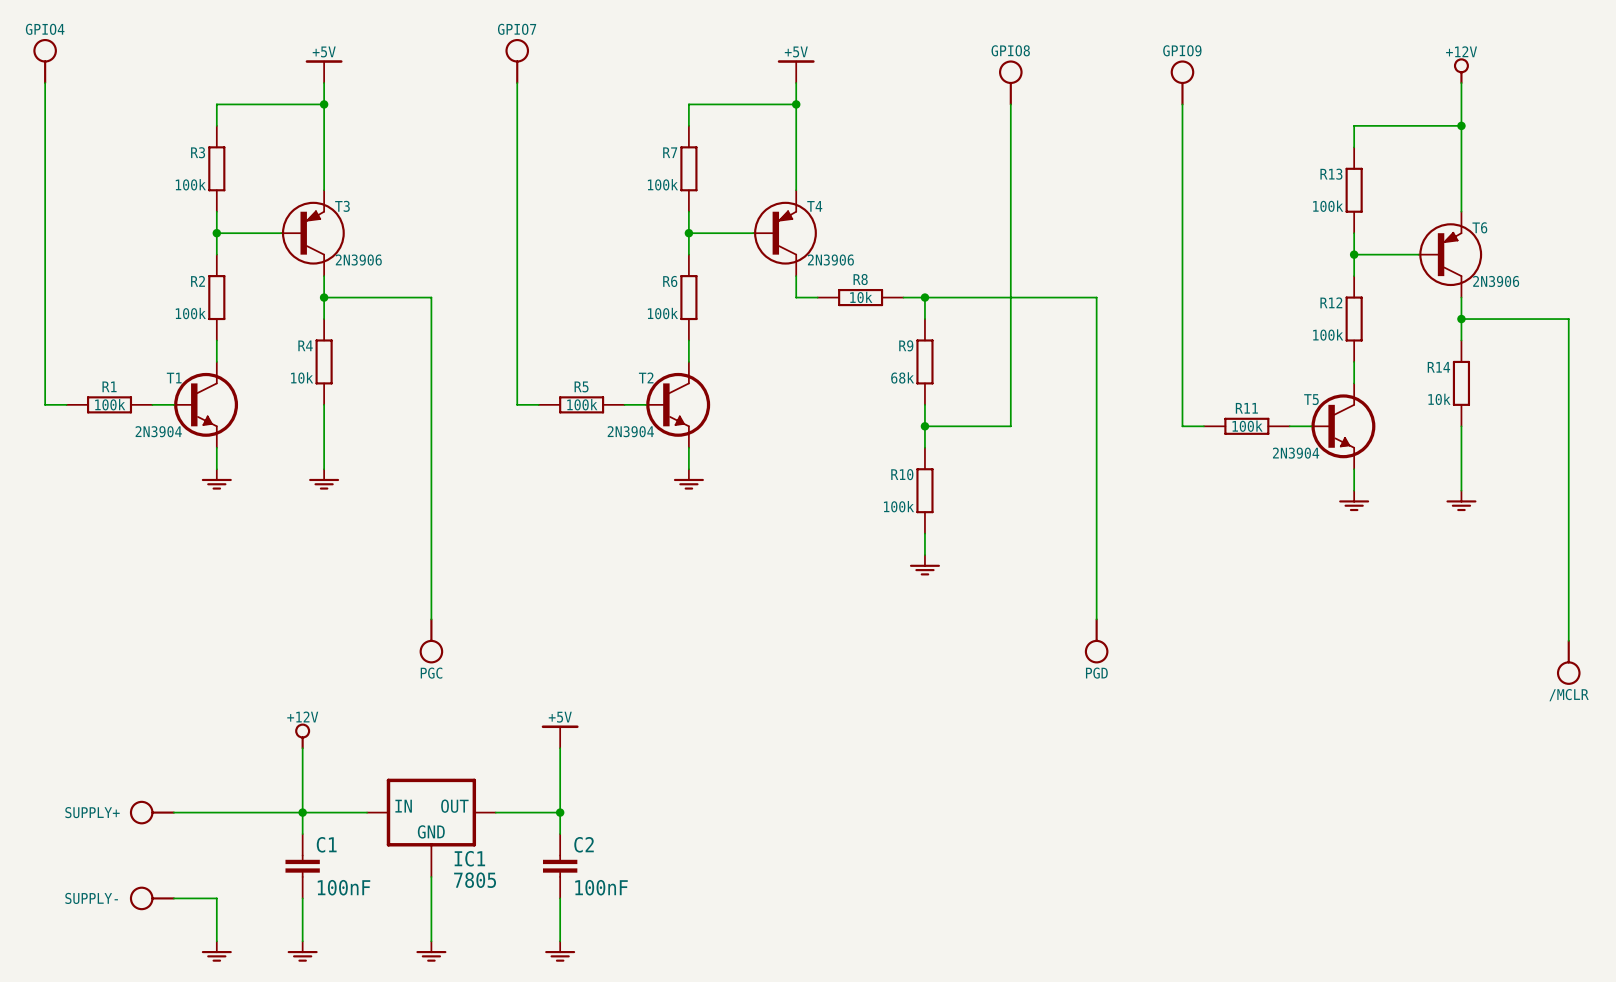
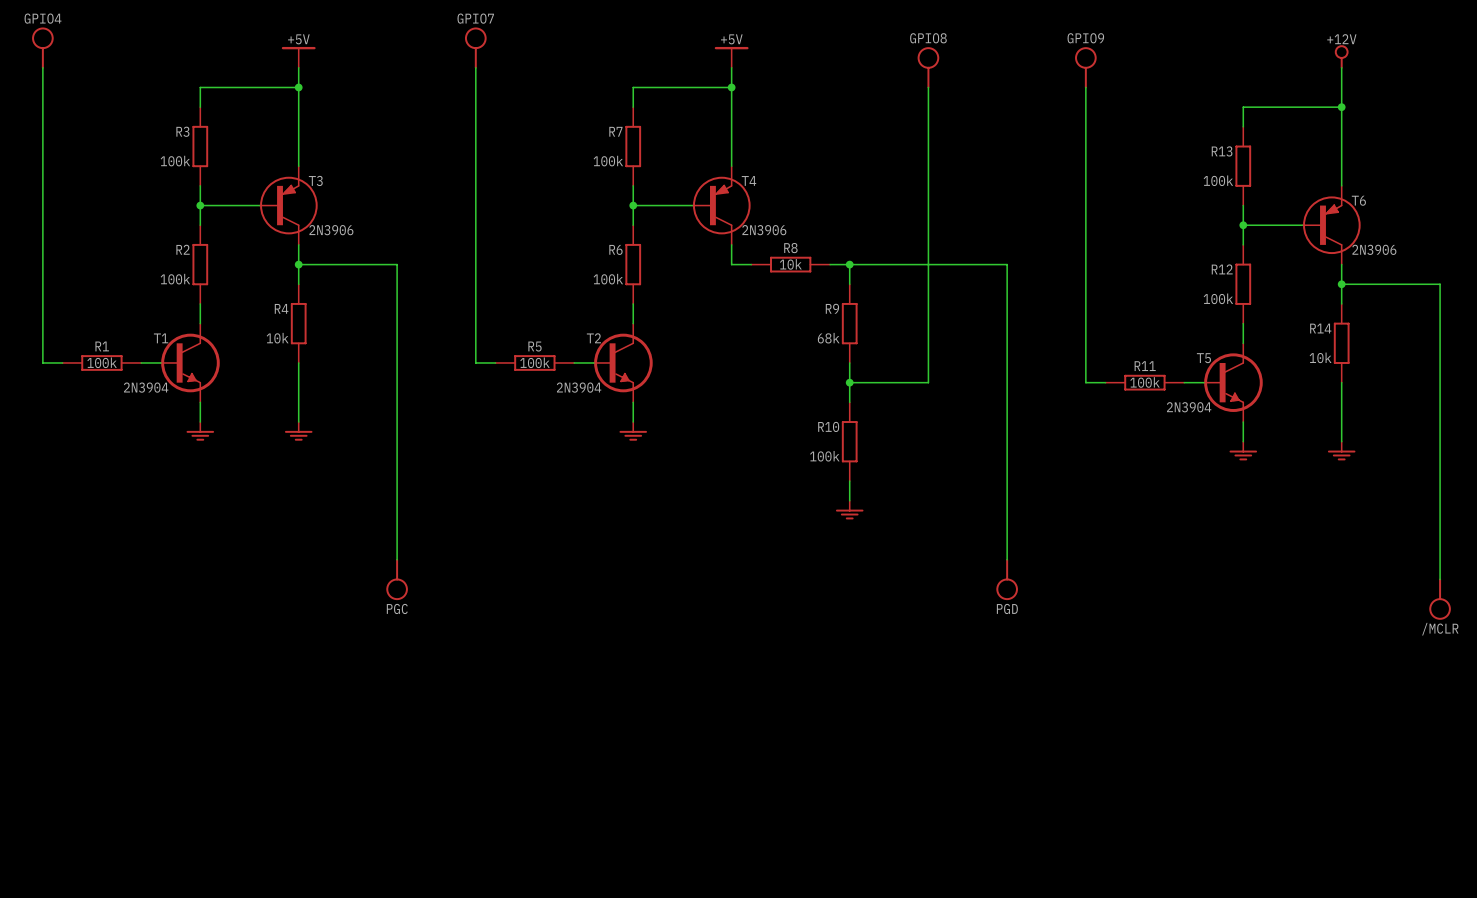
power symbol: +12V (302, 736) -> none
power symbol: +5V (560, 737) -> none
wire: (302, 748) (302, 834) -> none
wire: (560, 748) (560, 834) -> none
SUPPLY+: (152, 812) -> none
wire: (173, 812) (367, 812) -> none
junction: (302, 812) -> none
wire: (495, 812) (560, 812) -> none
junction: (560, 812) -> none
IC1: 7805 (431, 828) -> none
C1: 100nF (302, 866) -> none
C2: 100nF (560, 866) -> none
wire: (431, 876) (431, 941) -> none
SUPPLY-: (152, 898) -> none
wire: (173, 898) (216, 898) (216, 941) -> none
wire: (302, 898) (302, 941) -> none
wire: (560, 898) (560, 941) -> none
power symbol: (216, 951) -> none
power symbol: (302, 951) -> none
power symbol: (431, 951) -> none
power symbol: (560, 951) -> none

